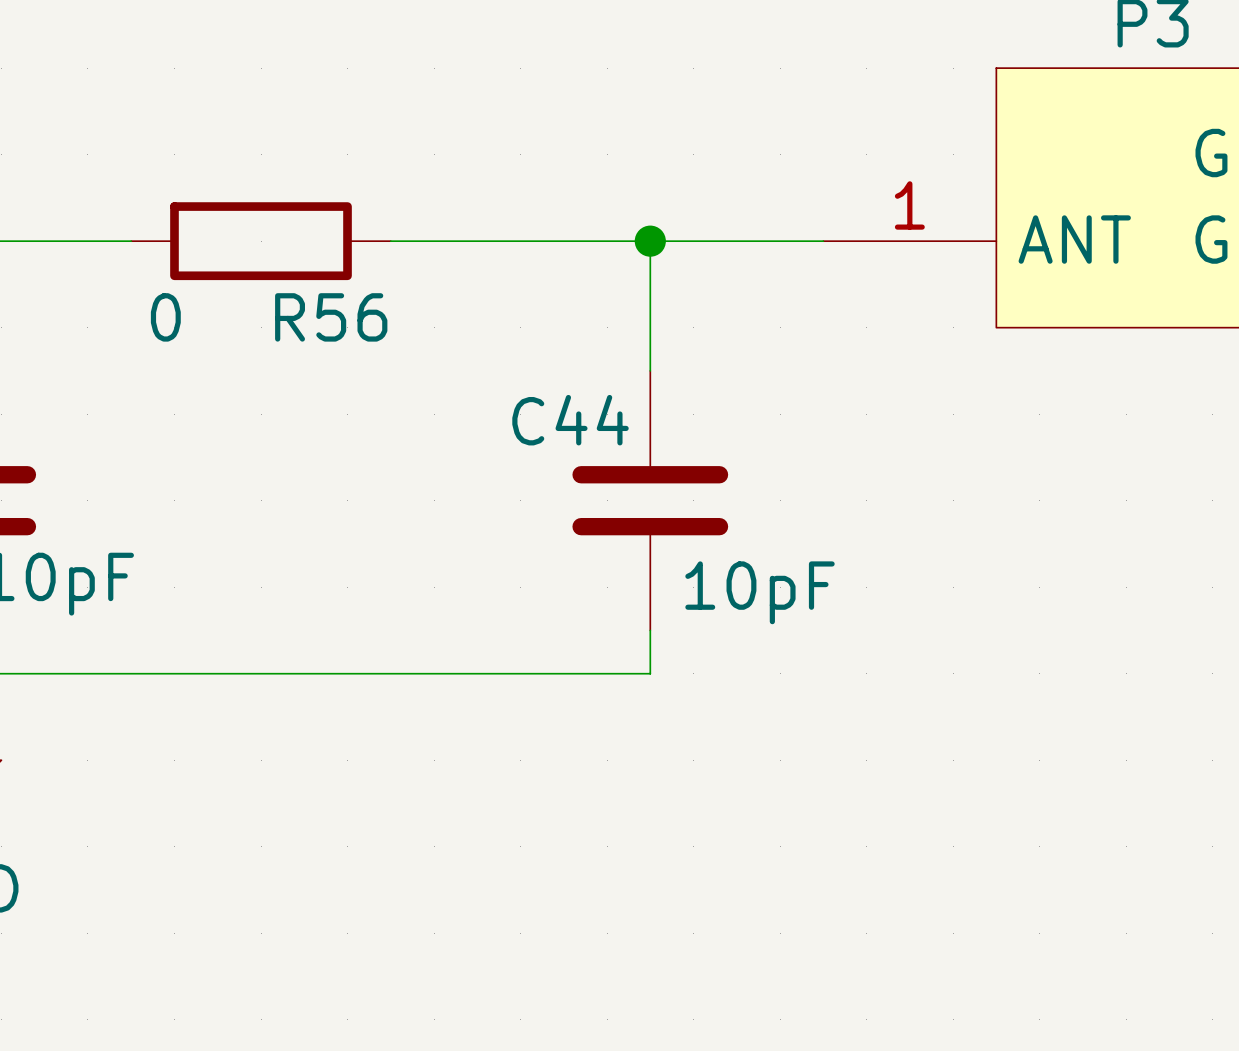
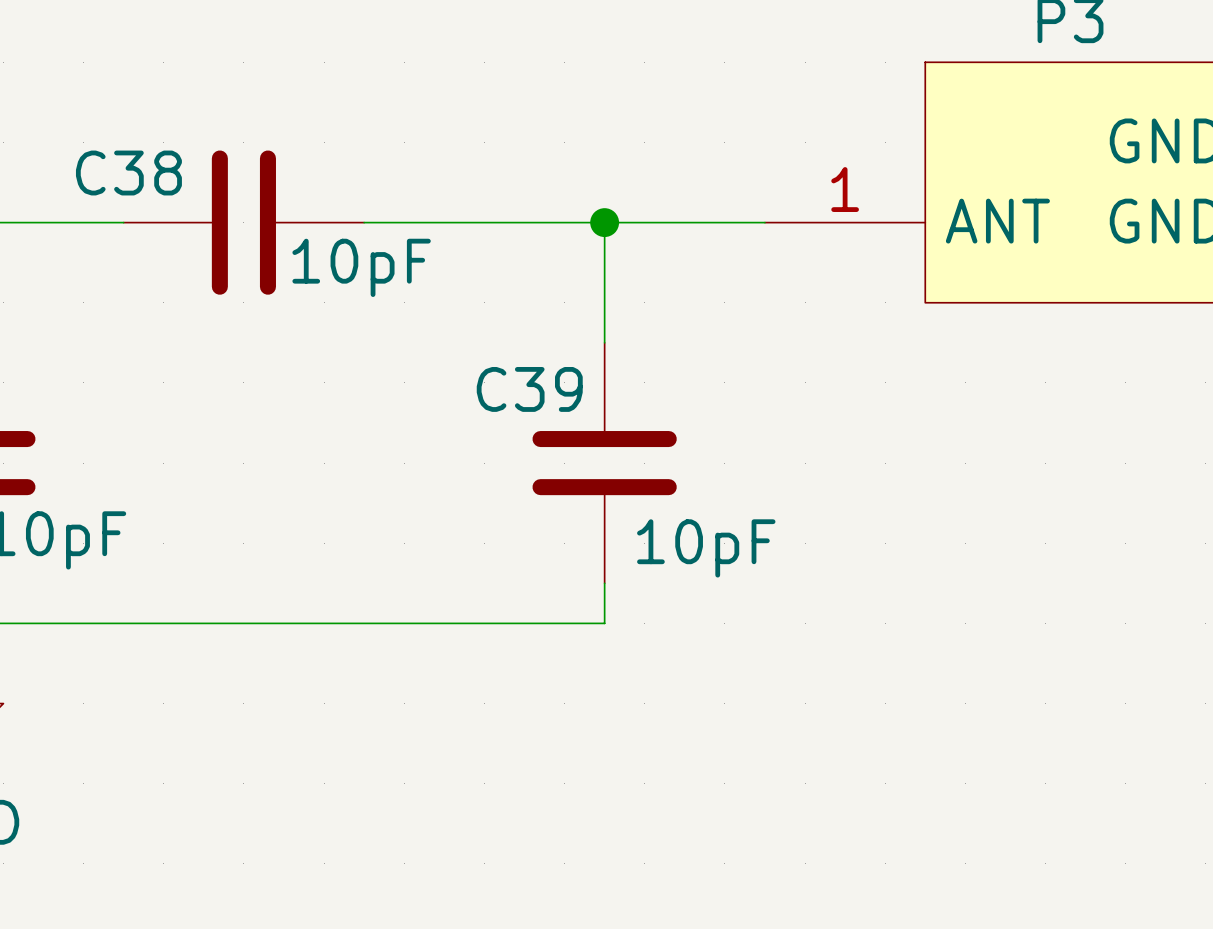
R56: 0 (261, 241) -> none
C38: none -> 10pF (243, 222)
C44 name: C44 (570, 420) -> C39 (529, 389)

